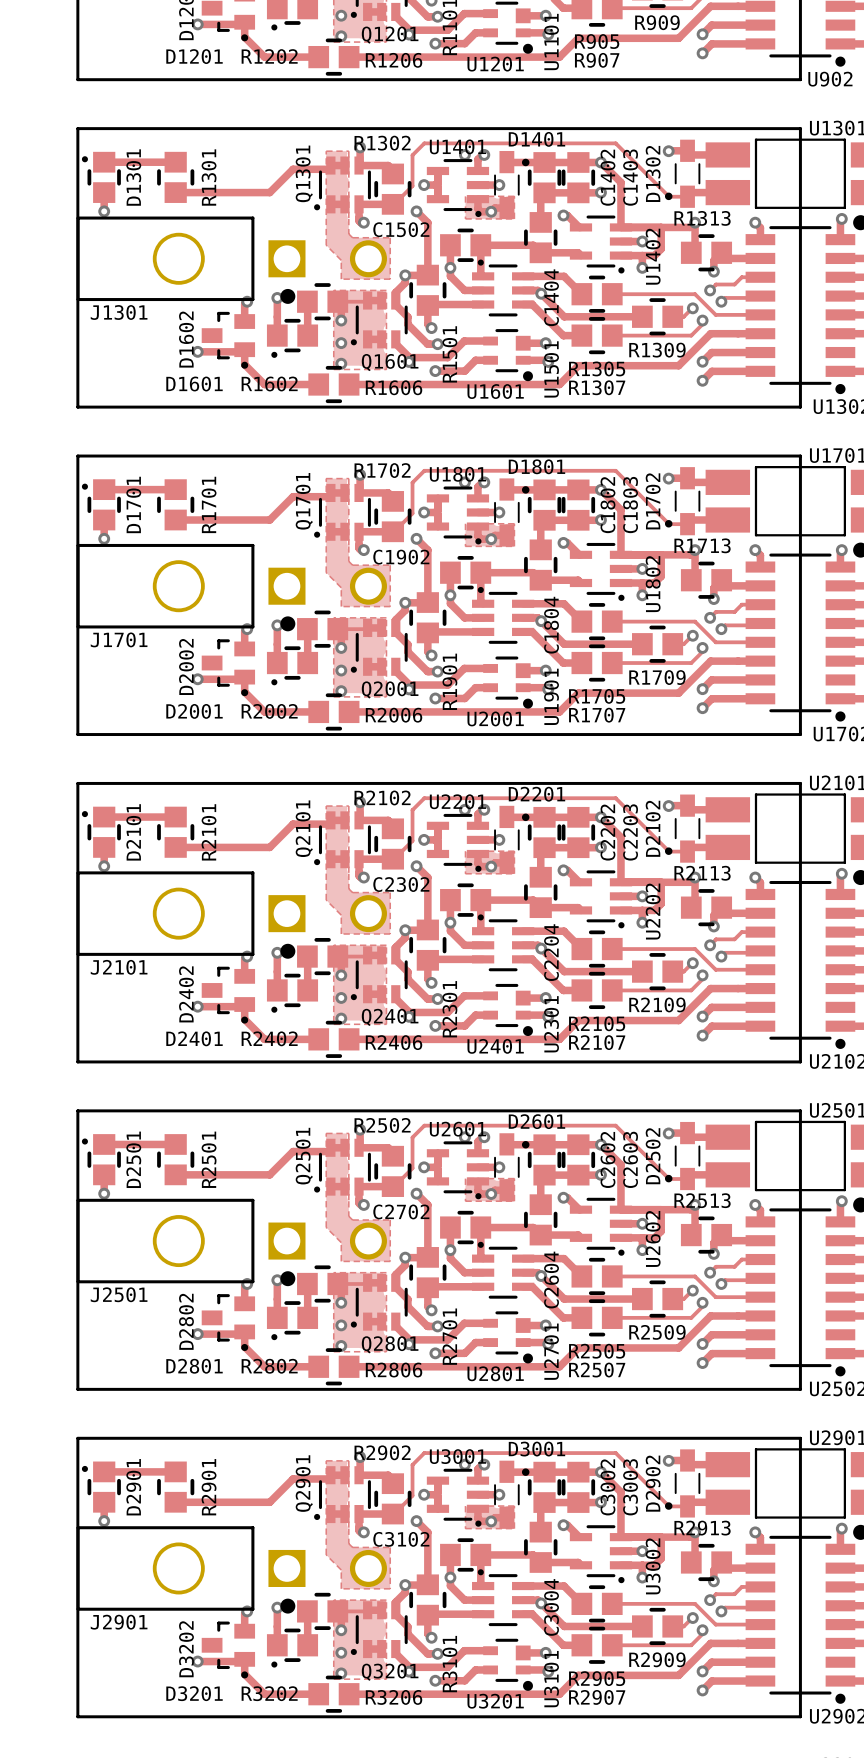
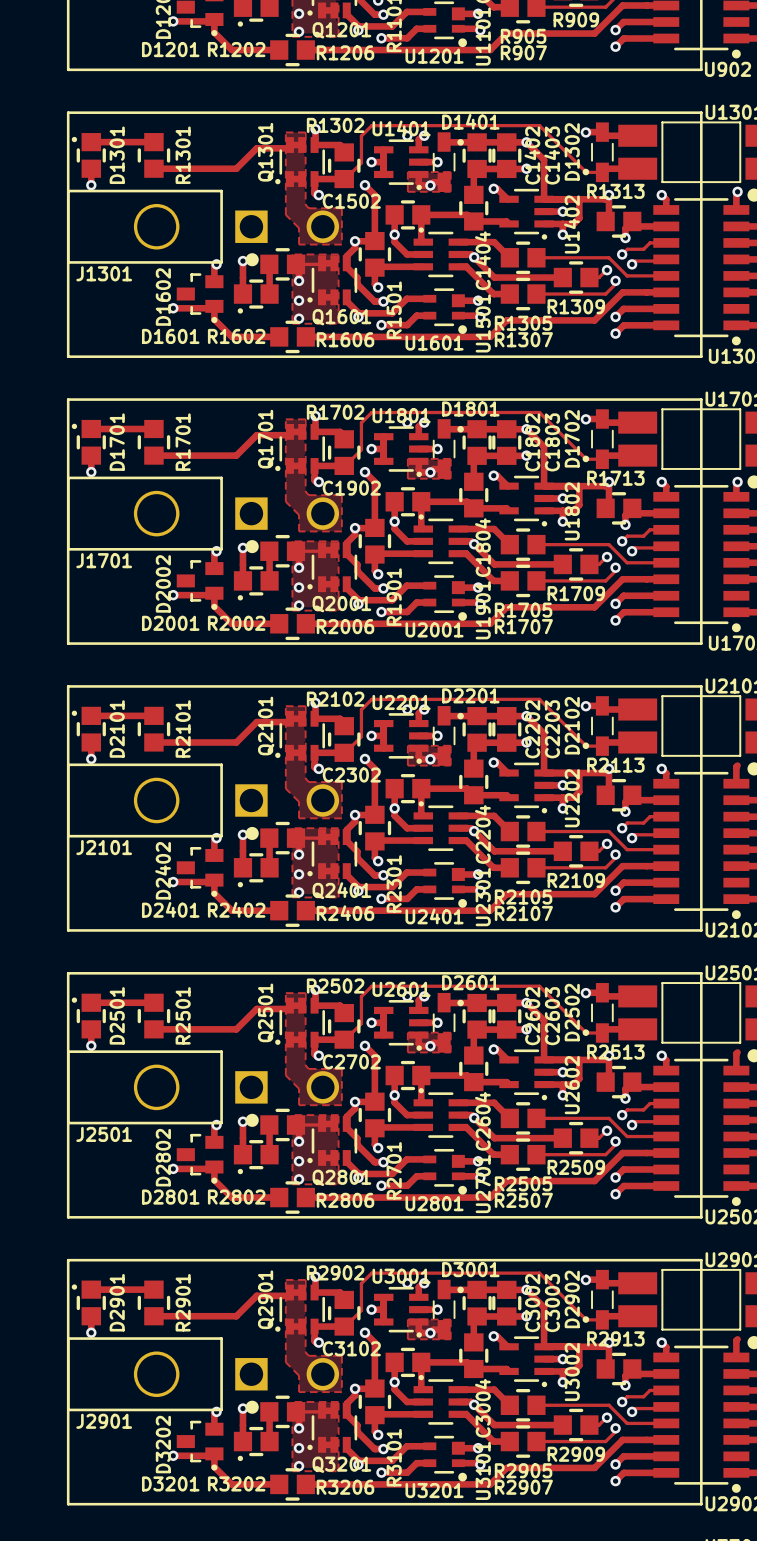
via: (841, 873) -> none
via: (841, 1201) -> none
via: (841, 1528) -> none

